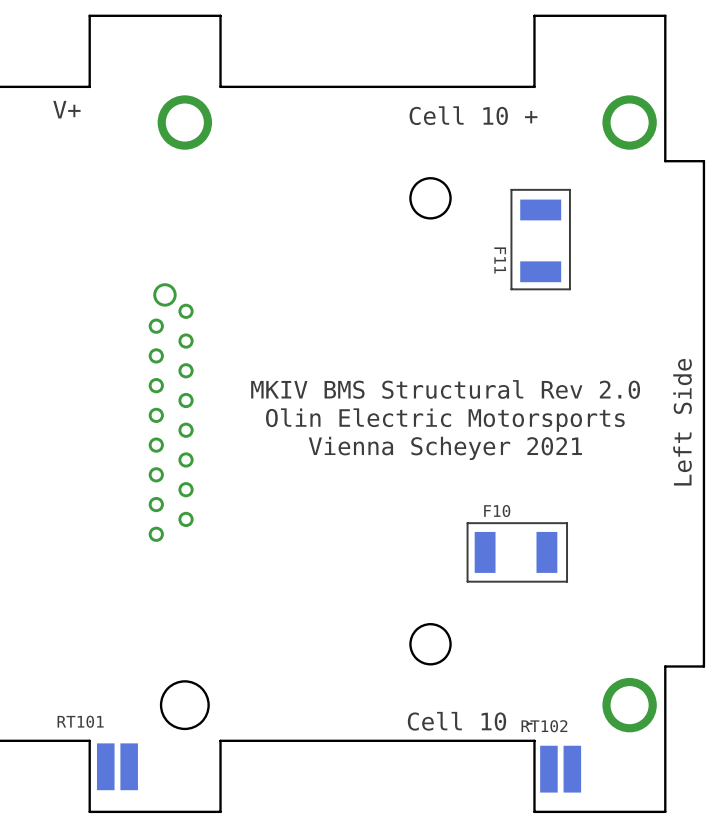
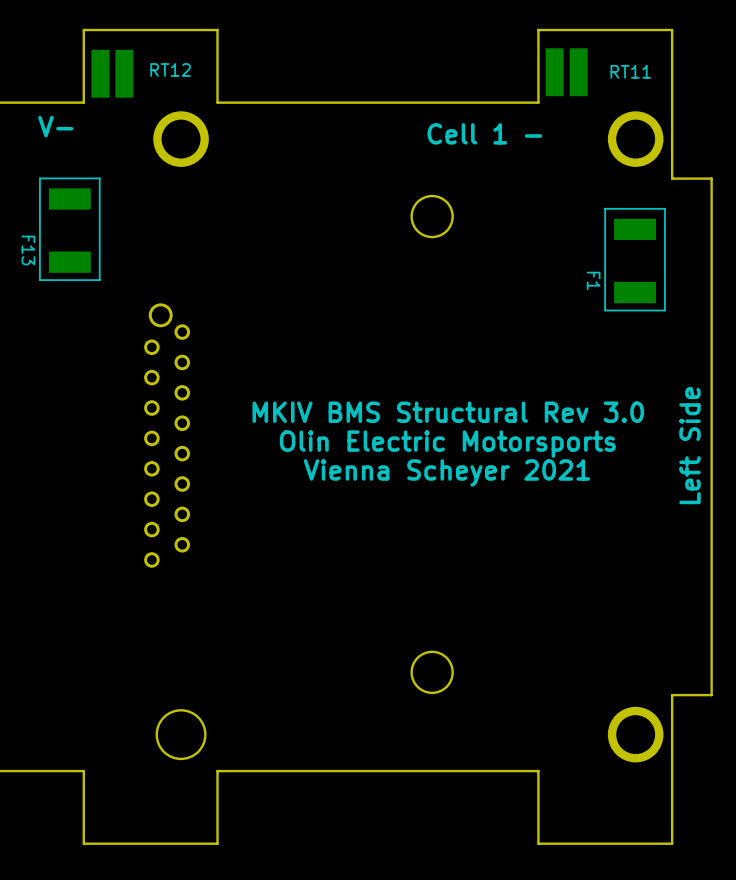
RT11: none -> (566, 72)
RT12: none -> (112, 73)
text: V+ (66, 109) -> V- (55, 126)
text: Cell 10 + (473, 115) -> Cell 1 - (484, 133)
F13: none -> (69, 229)
F11: (540, 239) -> none
F1: none -> (635, 259)
text: MKIV BMS Structural Rev 2.0 (445, 389) -> MKIV BMS Structural Rev 3.0 (448, 412)
F10: (517, 552) -> none
text: Cell 10 - (470, 721) -> none
RT101: (117, 766) -> none
RT102: (560, 769) -> none

